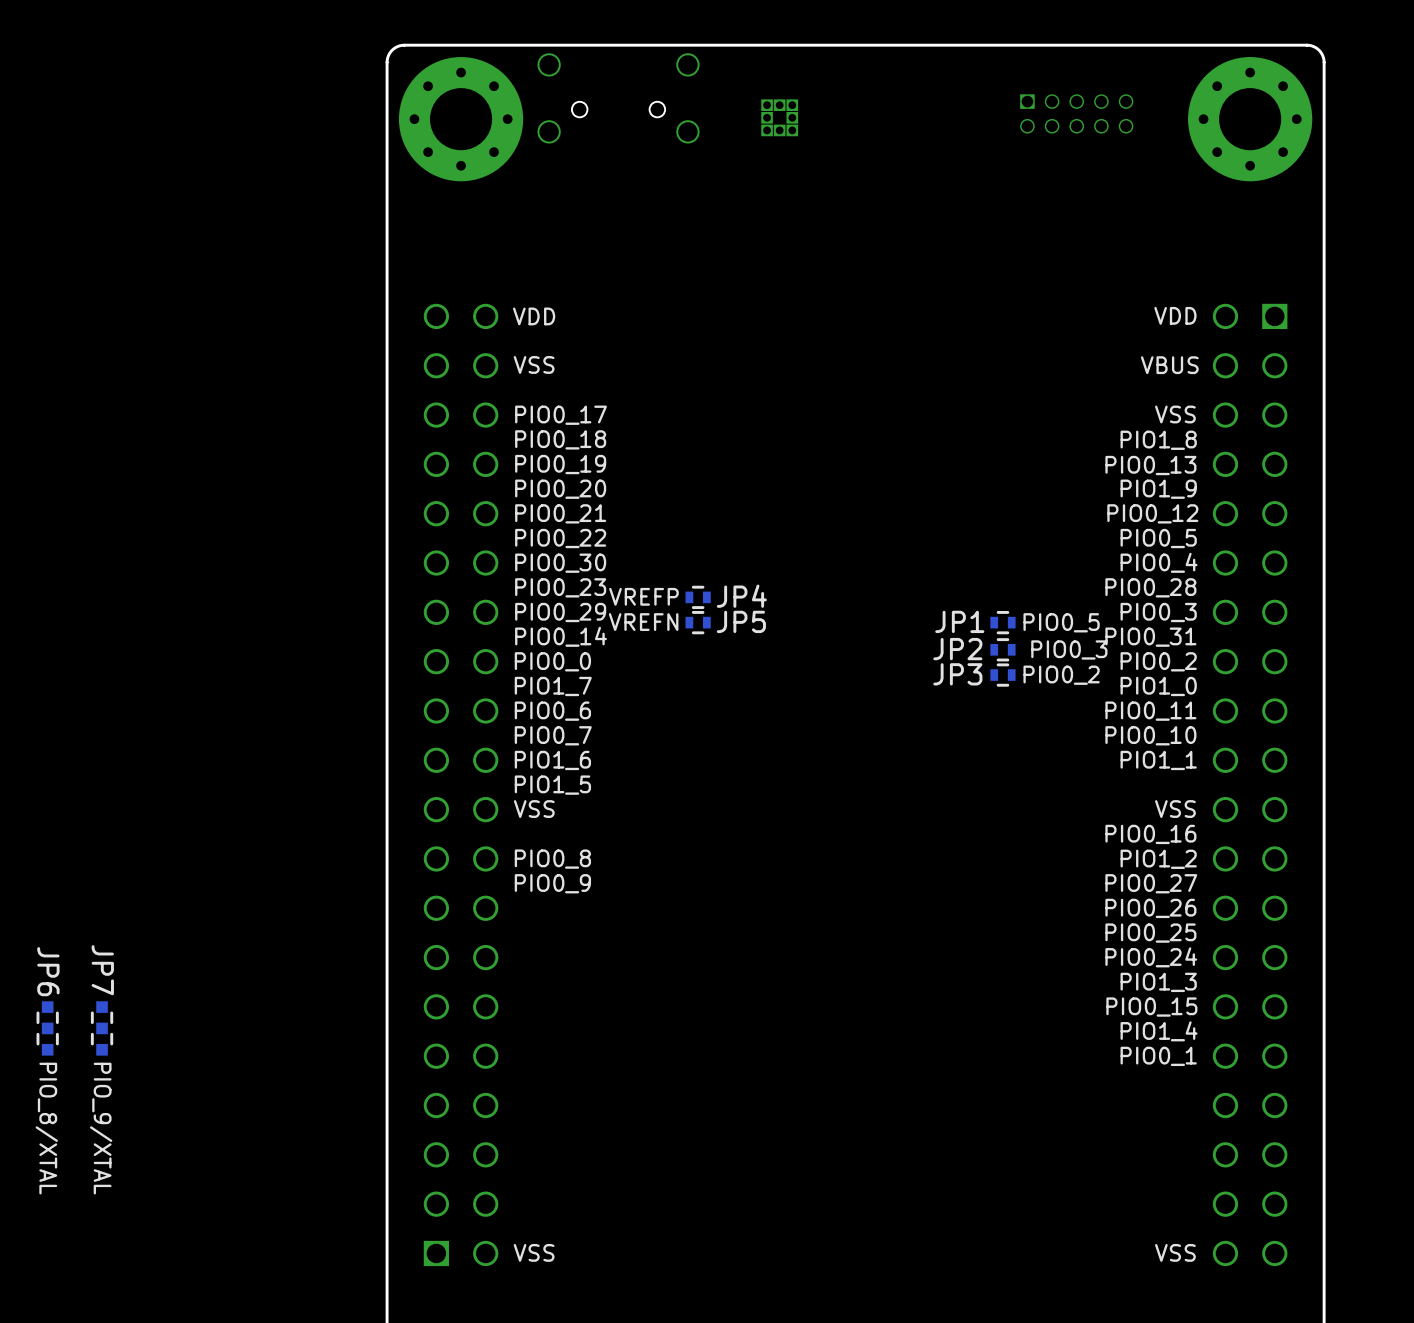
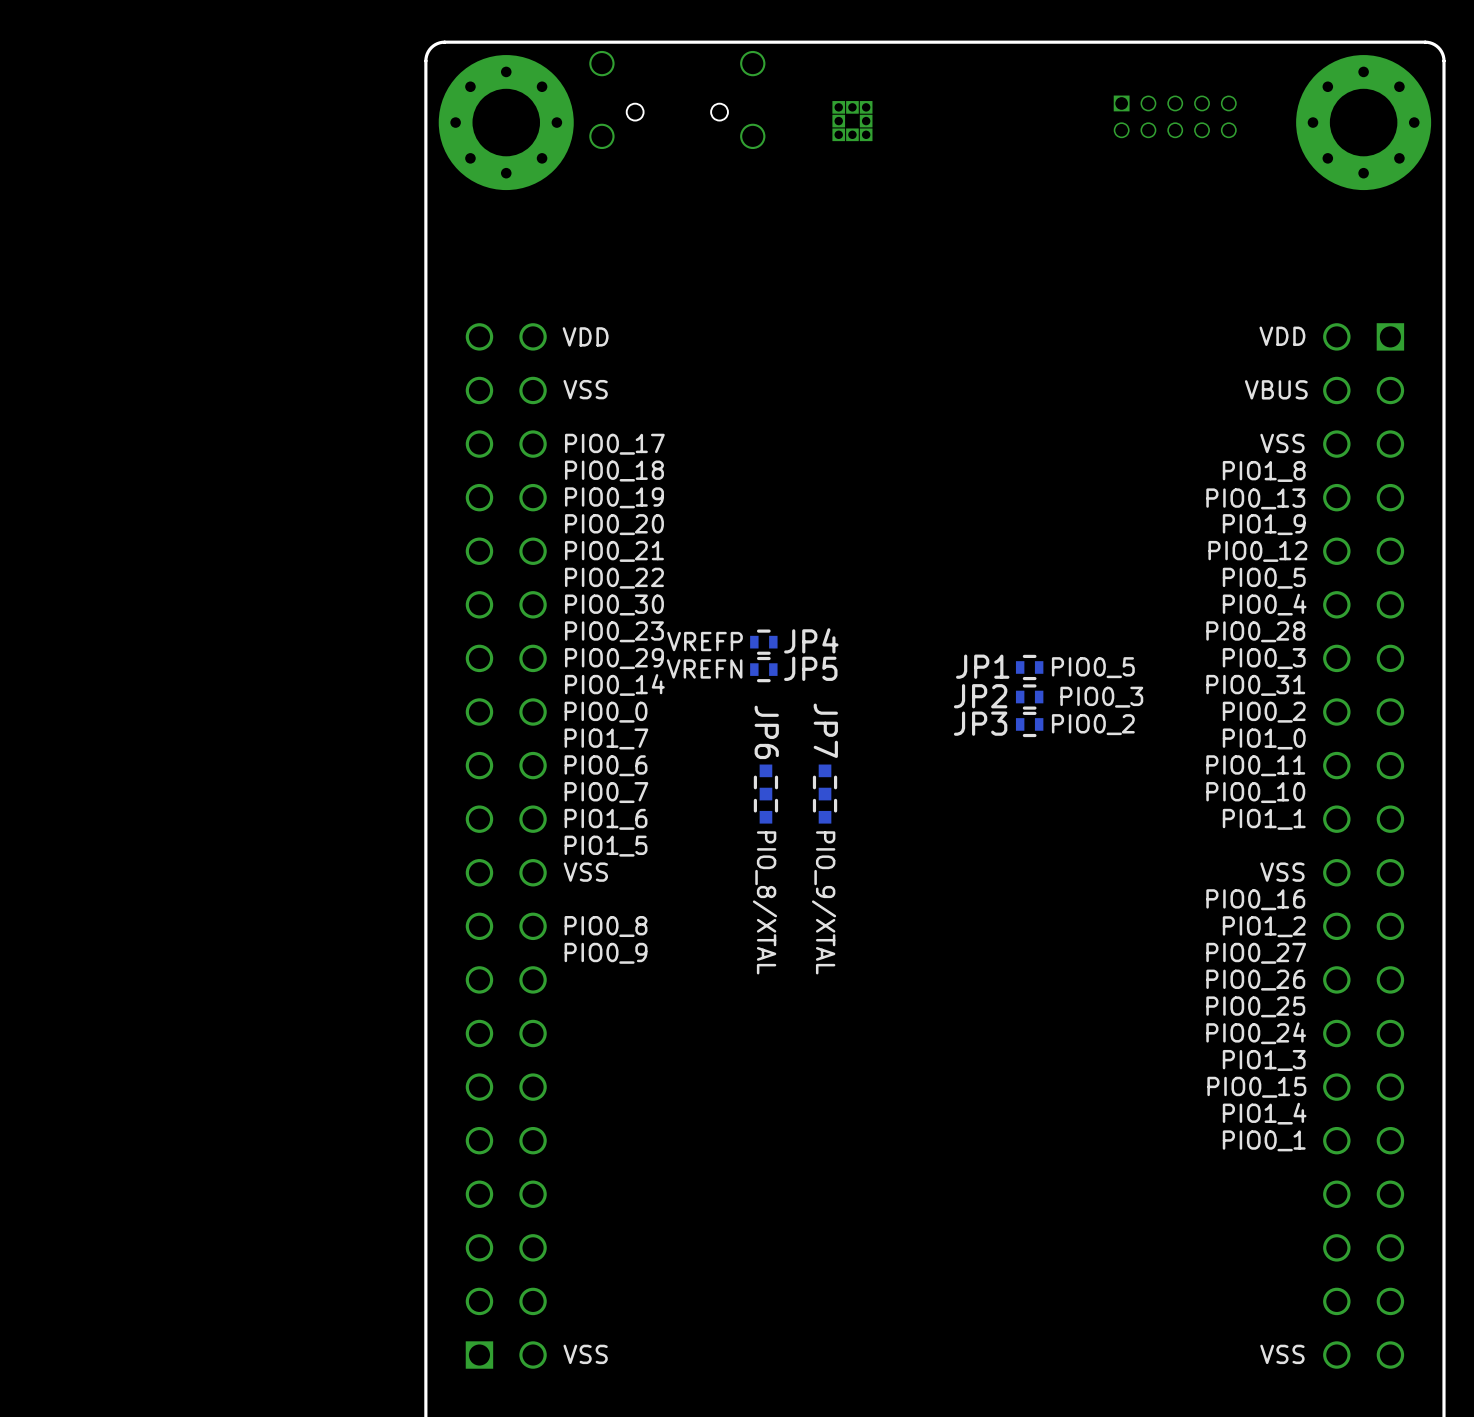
JP1 position: (1002, 622) -> (1029, 667)
JP2 position: (1002, 649) -> (1029, 697)
JP3 position: (1002, 675) -> (1029, 724)
JP6 position: (47, 1028) -> (765, 794)
JP7 position: (102, 1028) -> (825, 794)

